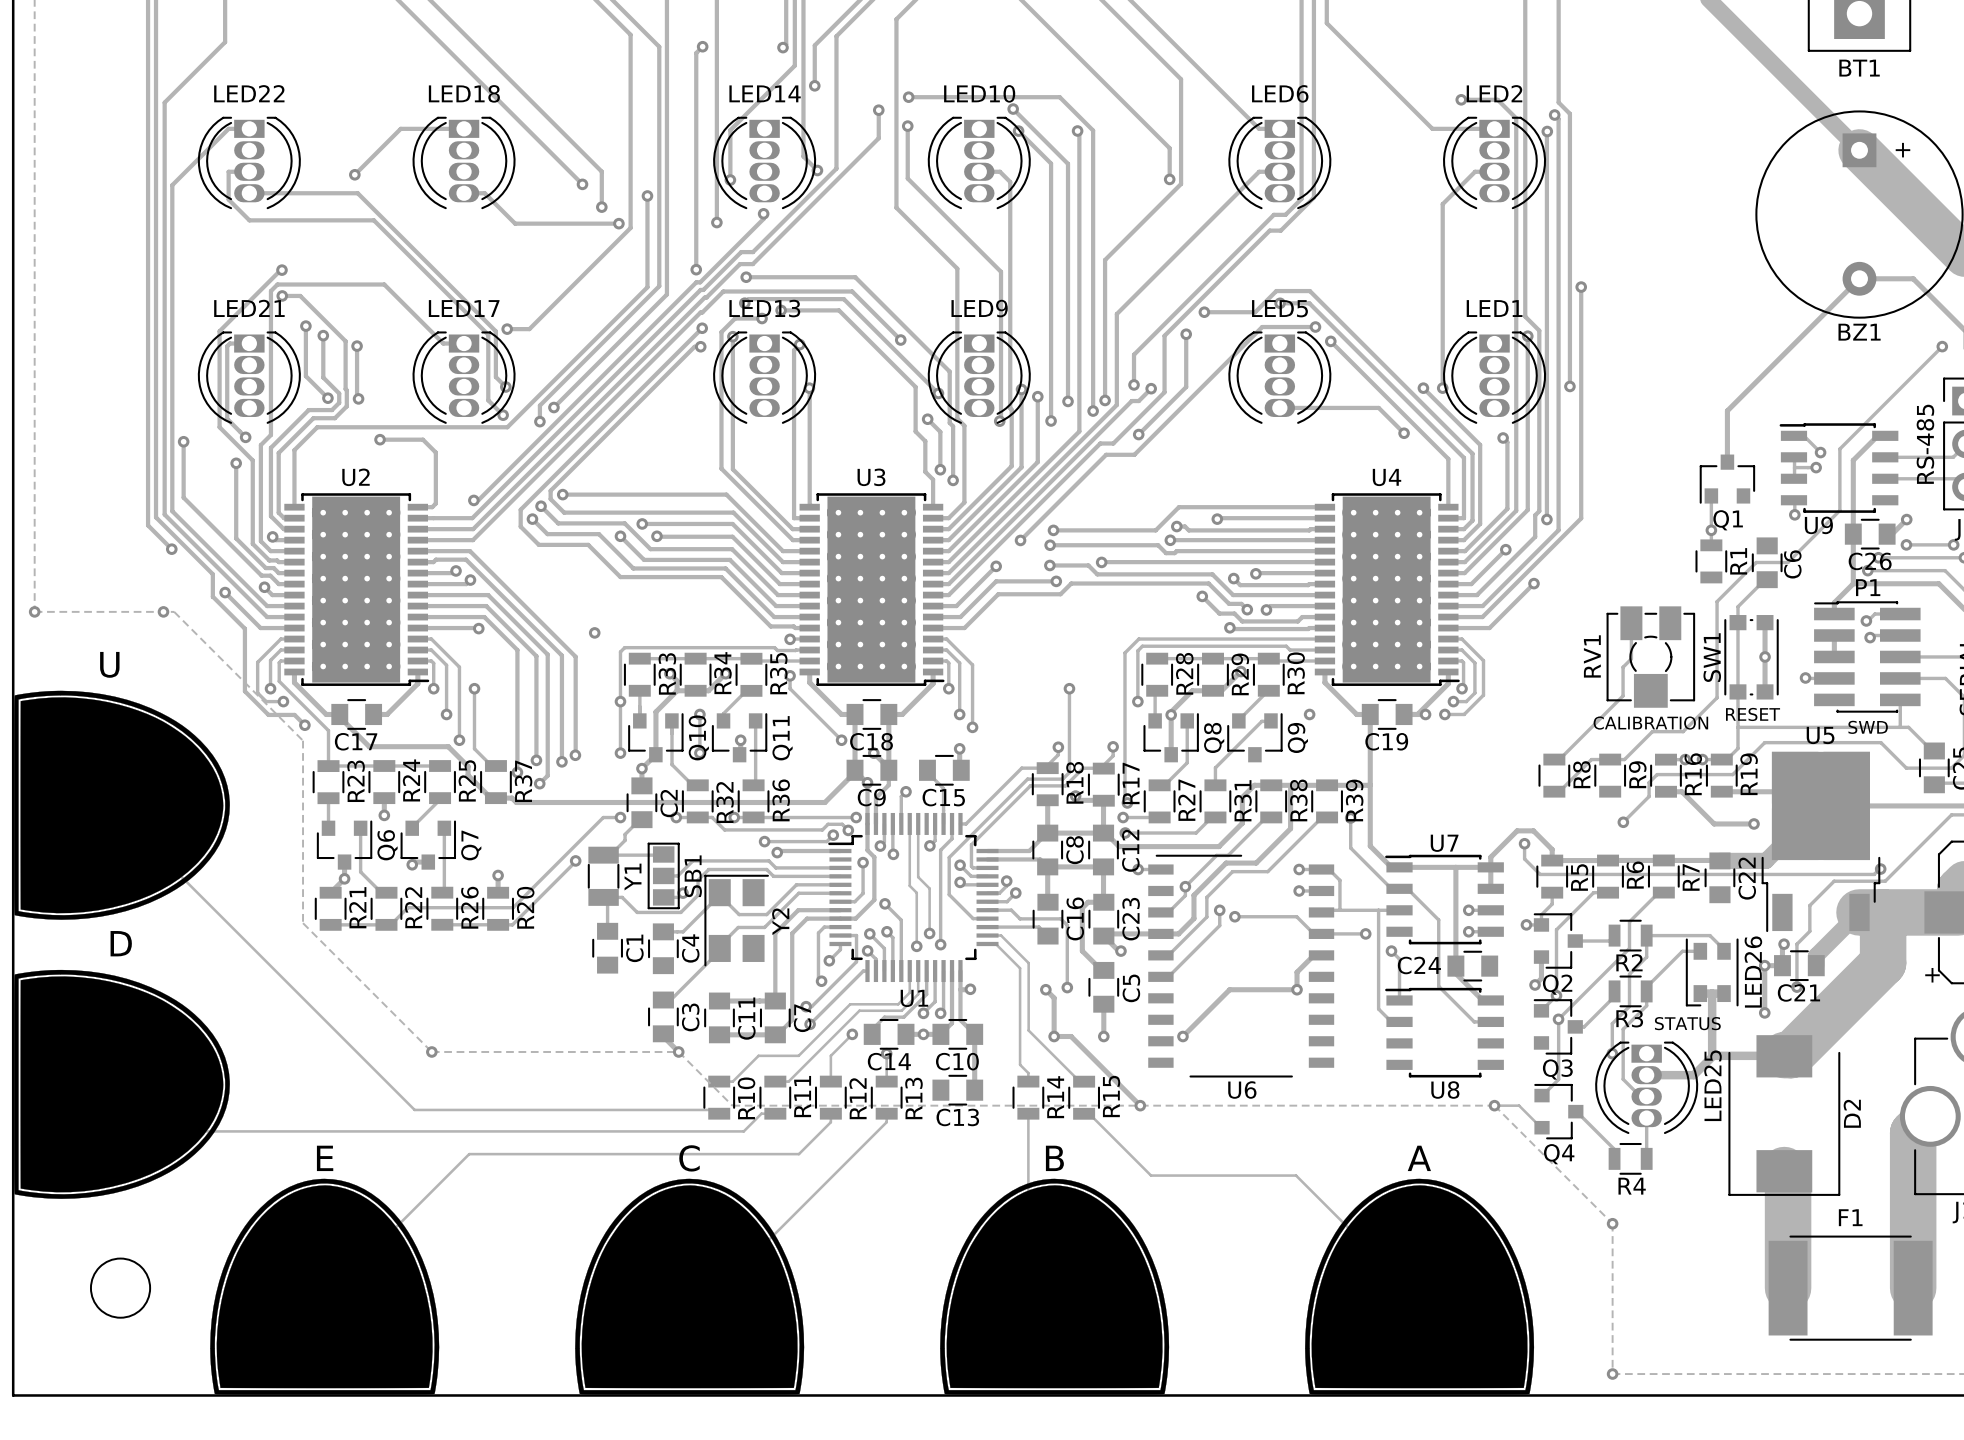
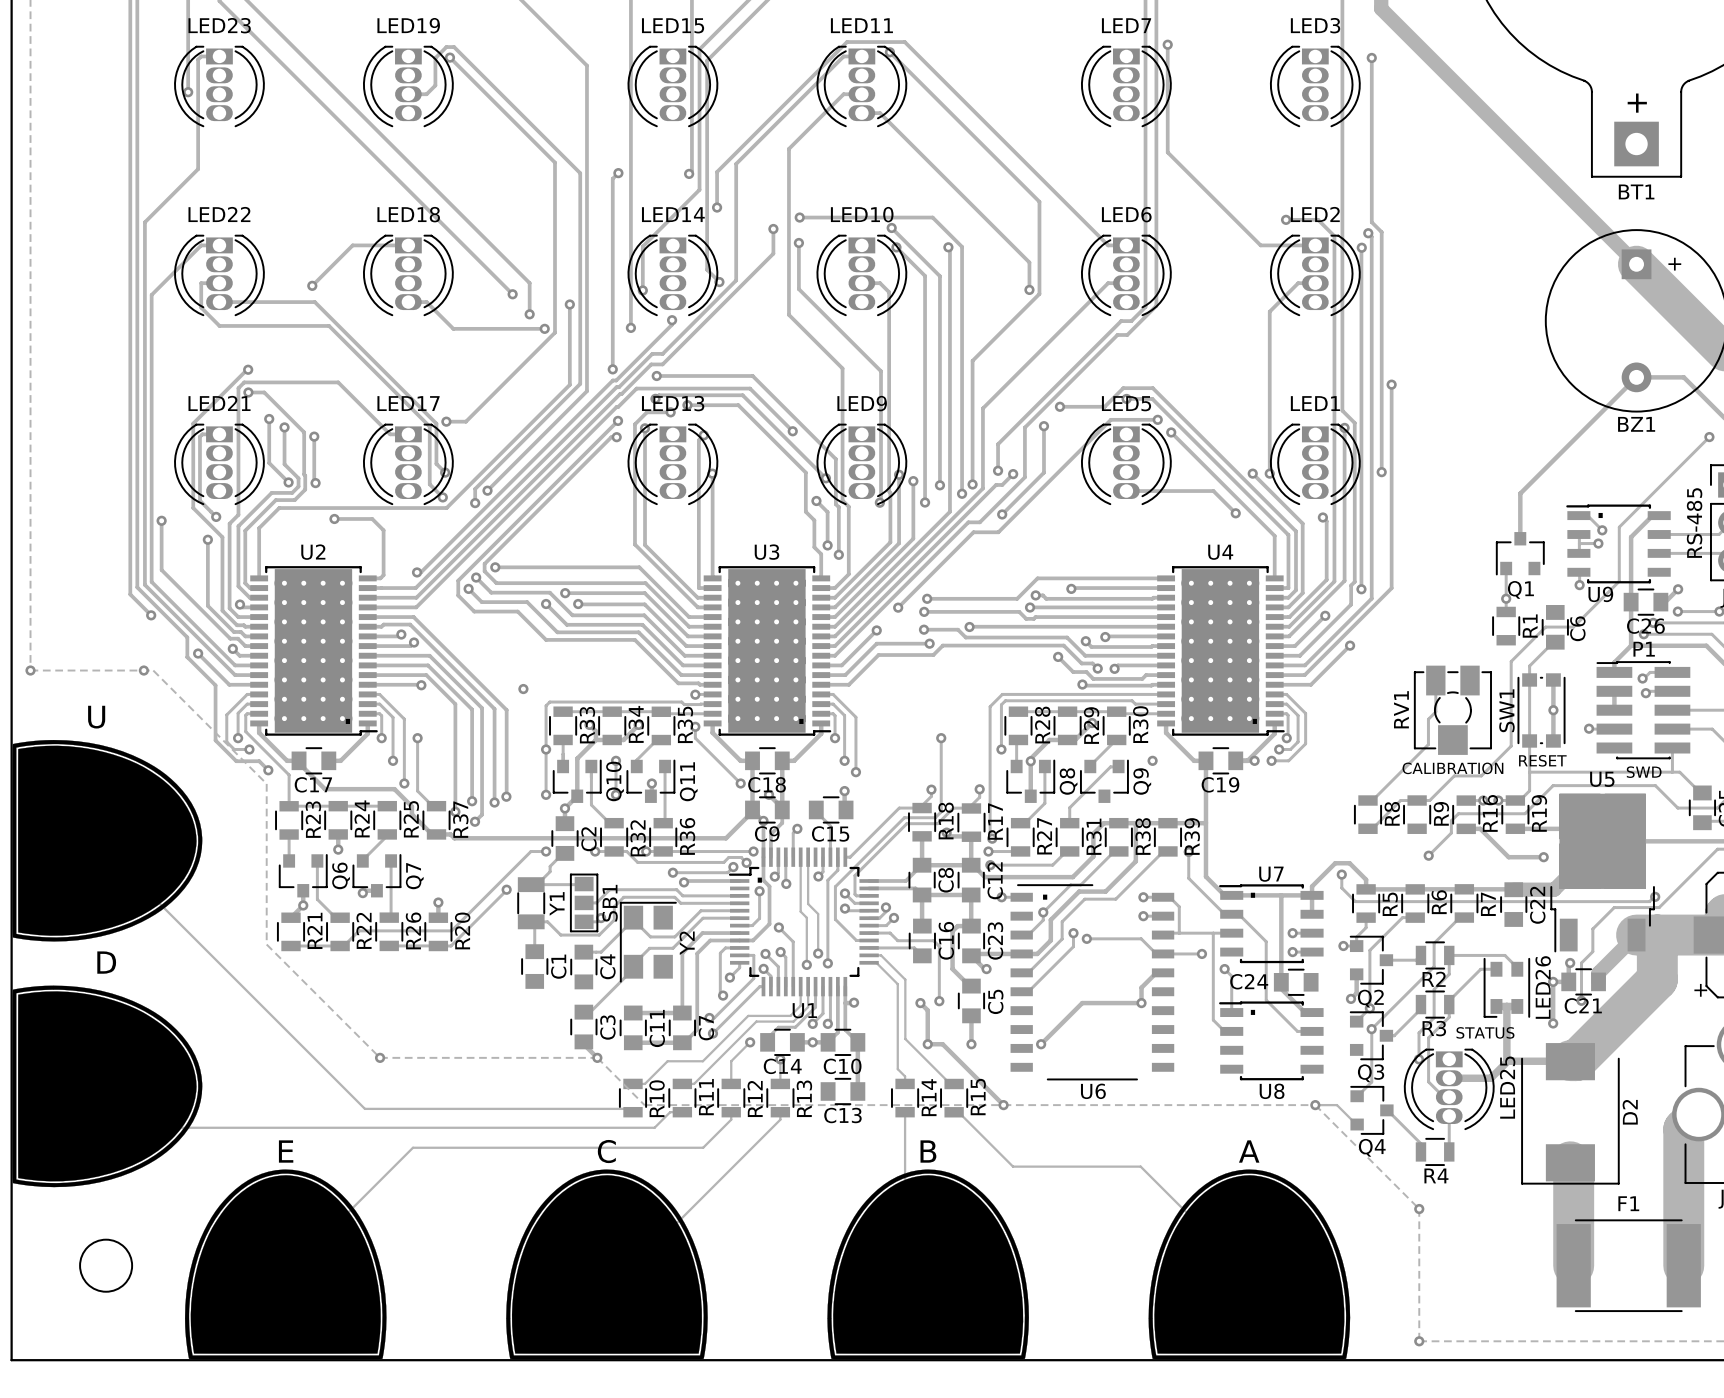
text: none -> . (1600, 515)
text: none -> . (347, 721)
text: none -> . (801, 721)
text: none -> . (1254, 721)
text: none -> . (759, 880)
text: none -> . (1252, 895)
text: none -> . (1045, 897)
text: none -> . (1252, 1012)

